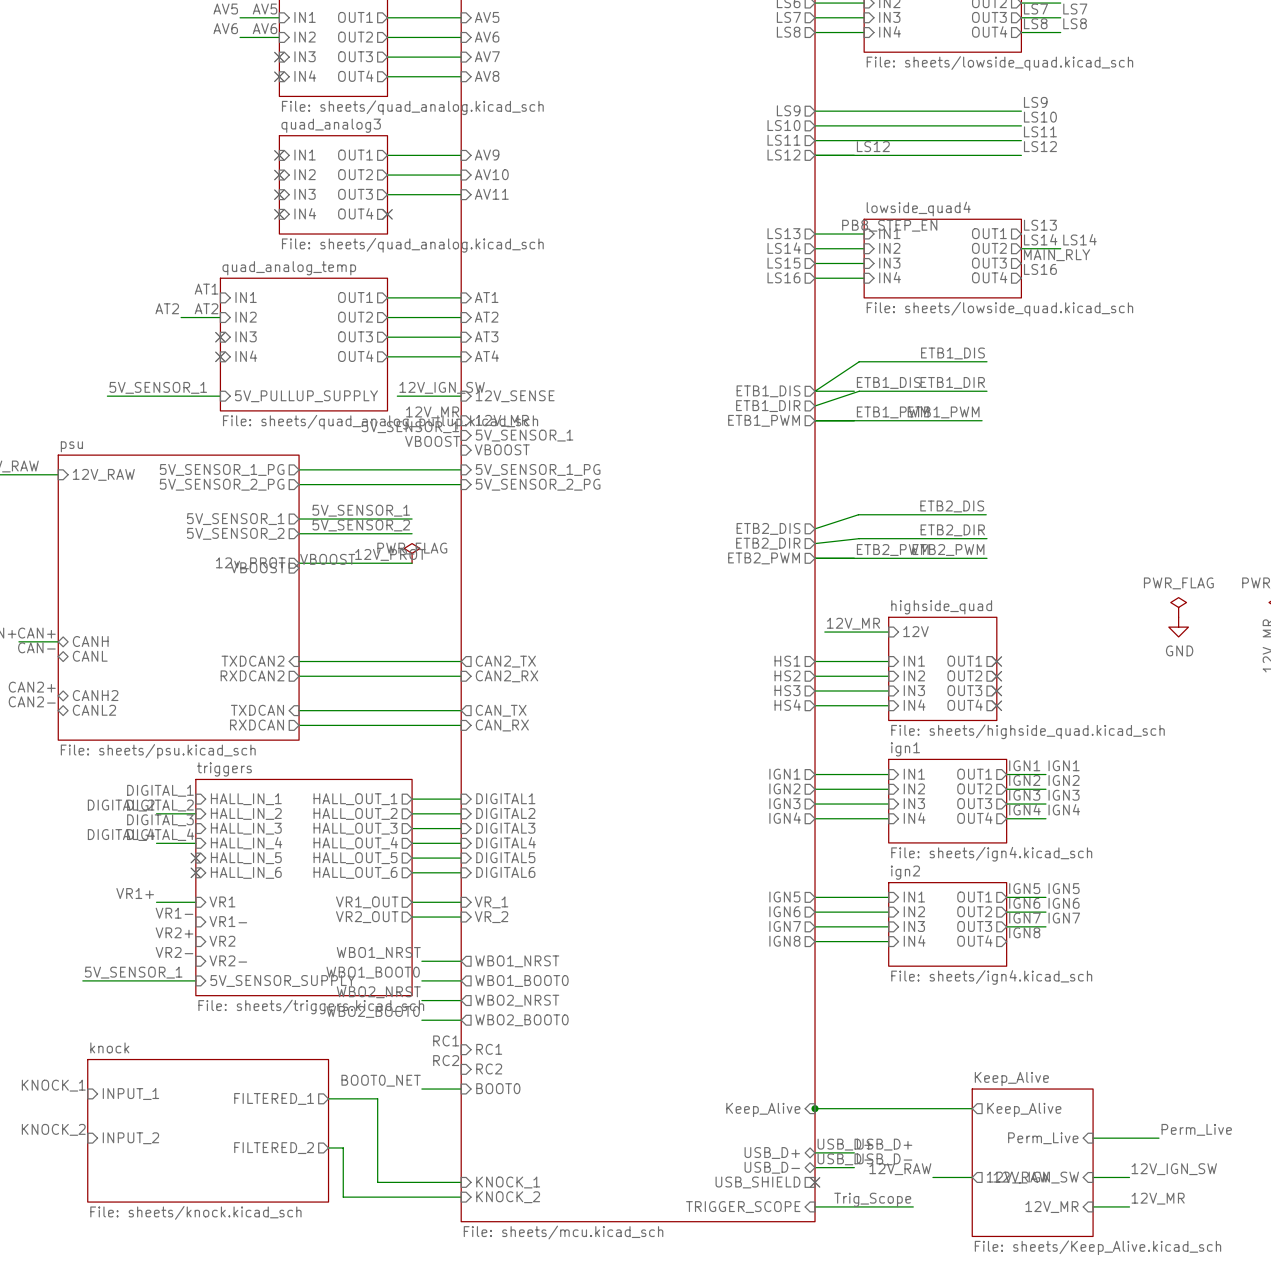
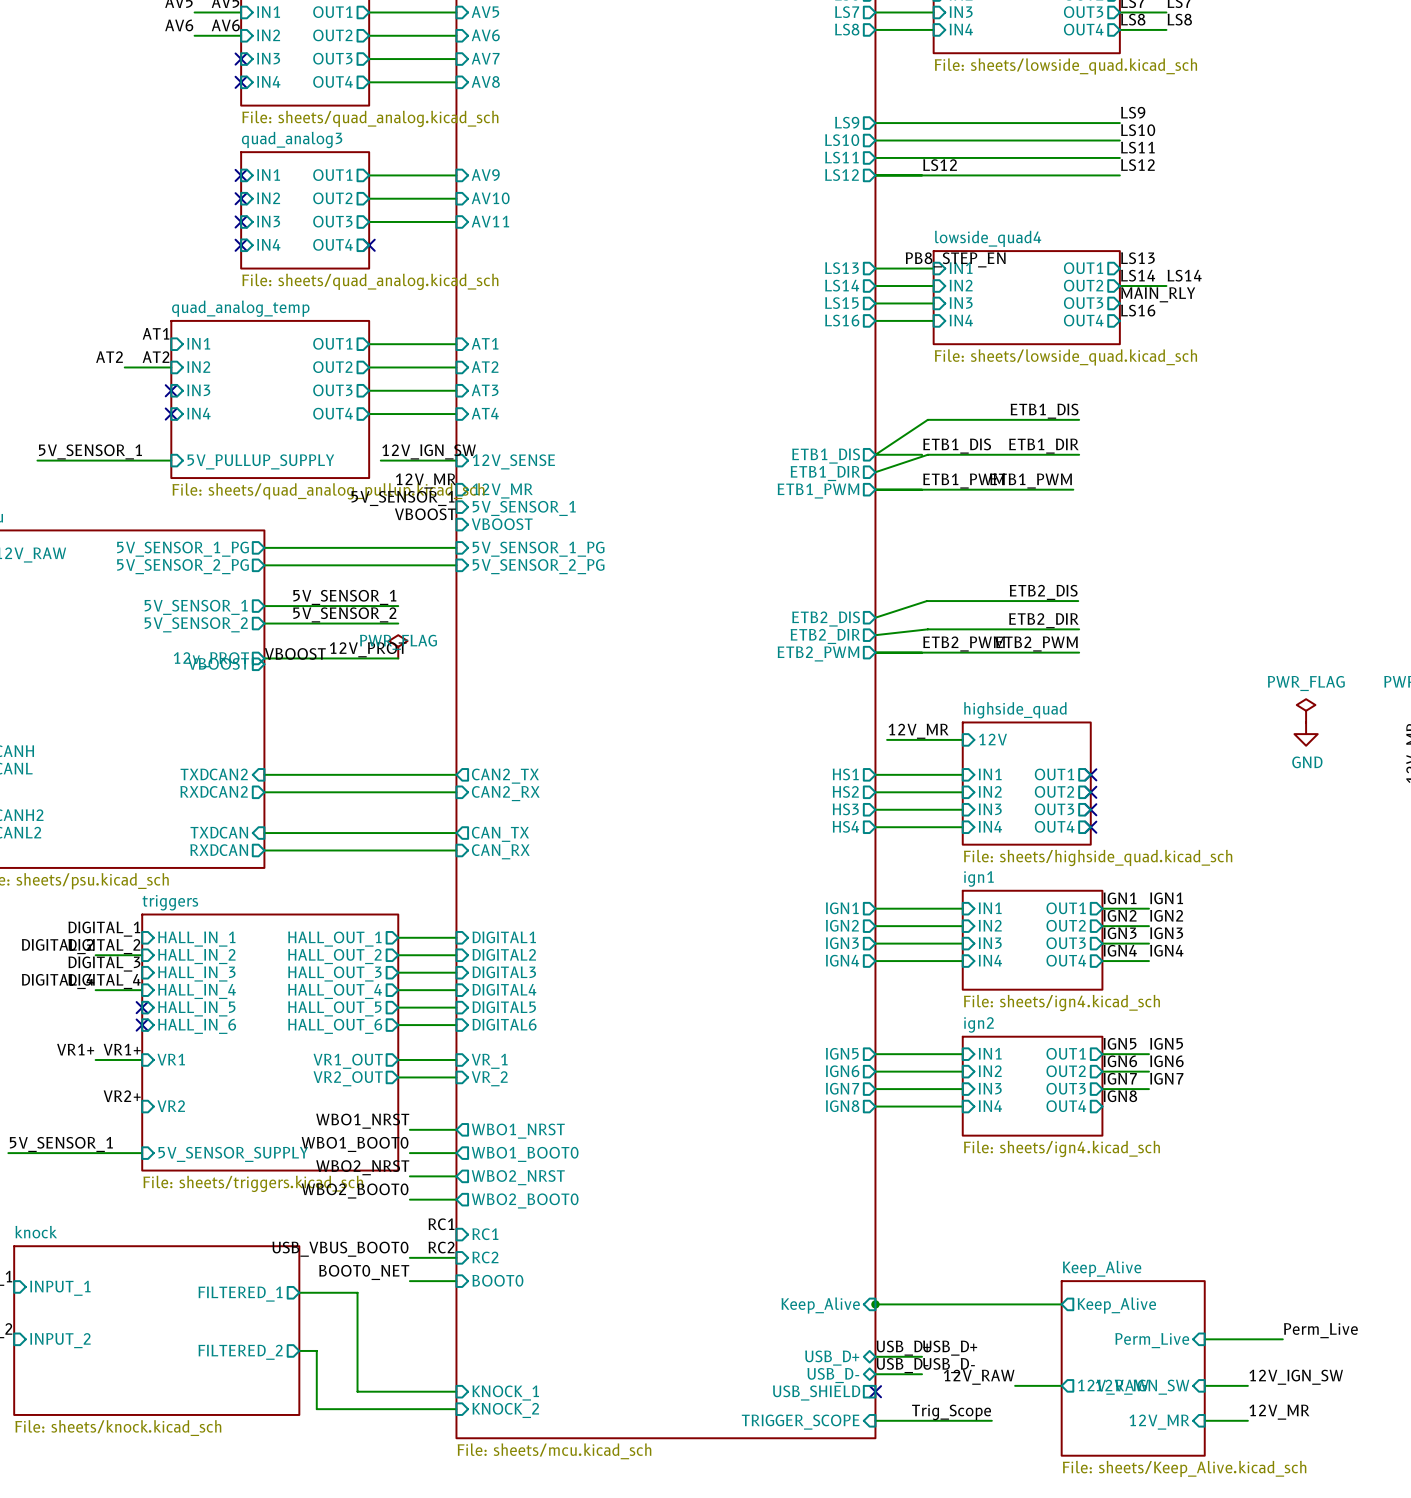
label: VR1- (174, 913) -> VR1+ (122, 1049)
sheet pin: VR1- (228, 921) -> none
label: VR2- (174, 952) -> none
sheet pin: VR2- (228, 960) -> none
label: none -> USB_VBUS_BOOT0 (340, 1249)
wire: none -> (409, 1257) (456, 1257)

